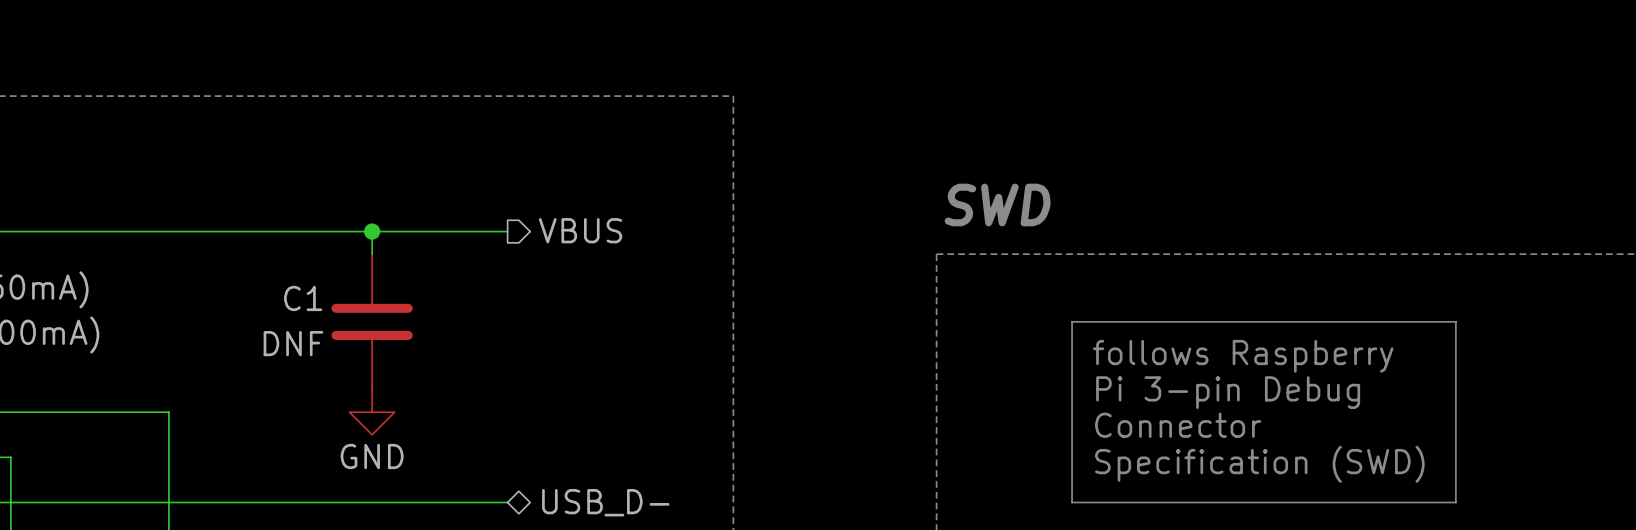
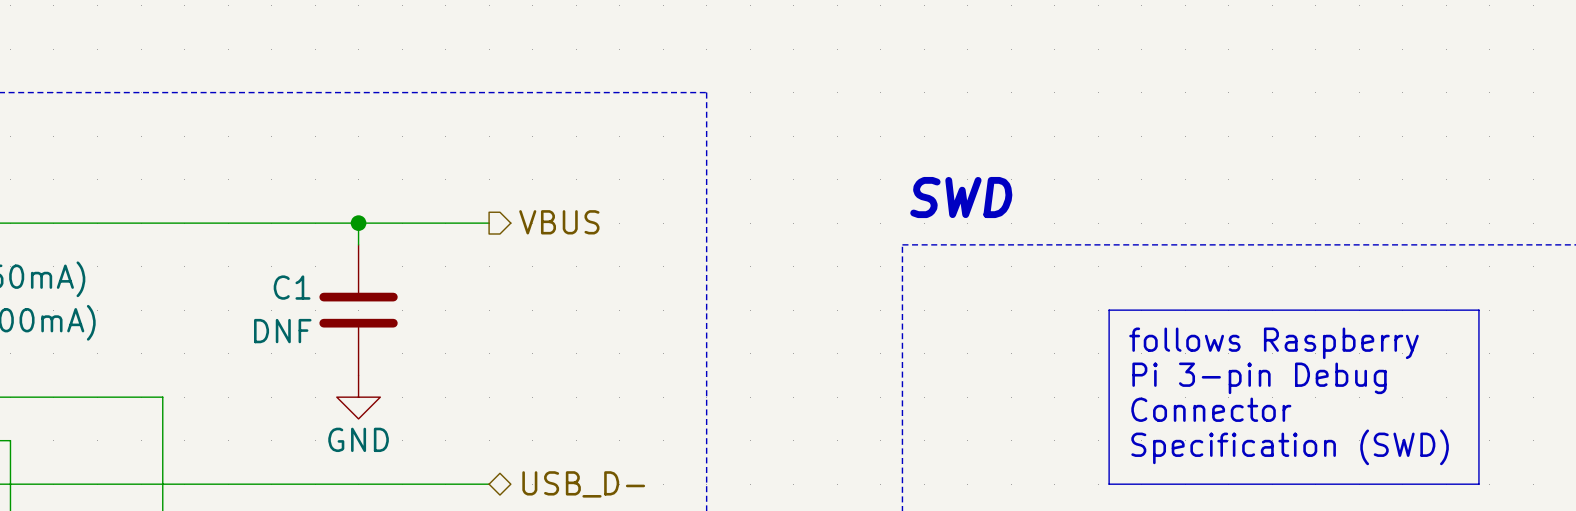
line: (1151, 321) (1072, 321) (1072, 502) (1151, 502) -> (1109, 310) (1109, 484)
line: (1455, 321) (1455, 502) -> (1402, 310) (1478, 310) (1478, 484) (1402, 484)
text position: follows Raspberry (1243, 356) -> follows Raspberry (1274, 343)
text position: Pi 3-pin Debug (1228, 392) -> Pi 3-pin Debug (1259, 378)
text position: Connector (1178, 425) -> Connector (1211, 409)
text position: Specification (SWD) (1259, 464) -> Specification (SWD) (1290, 447)

